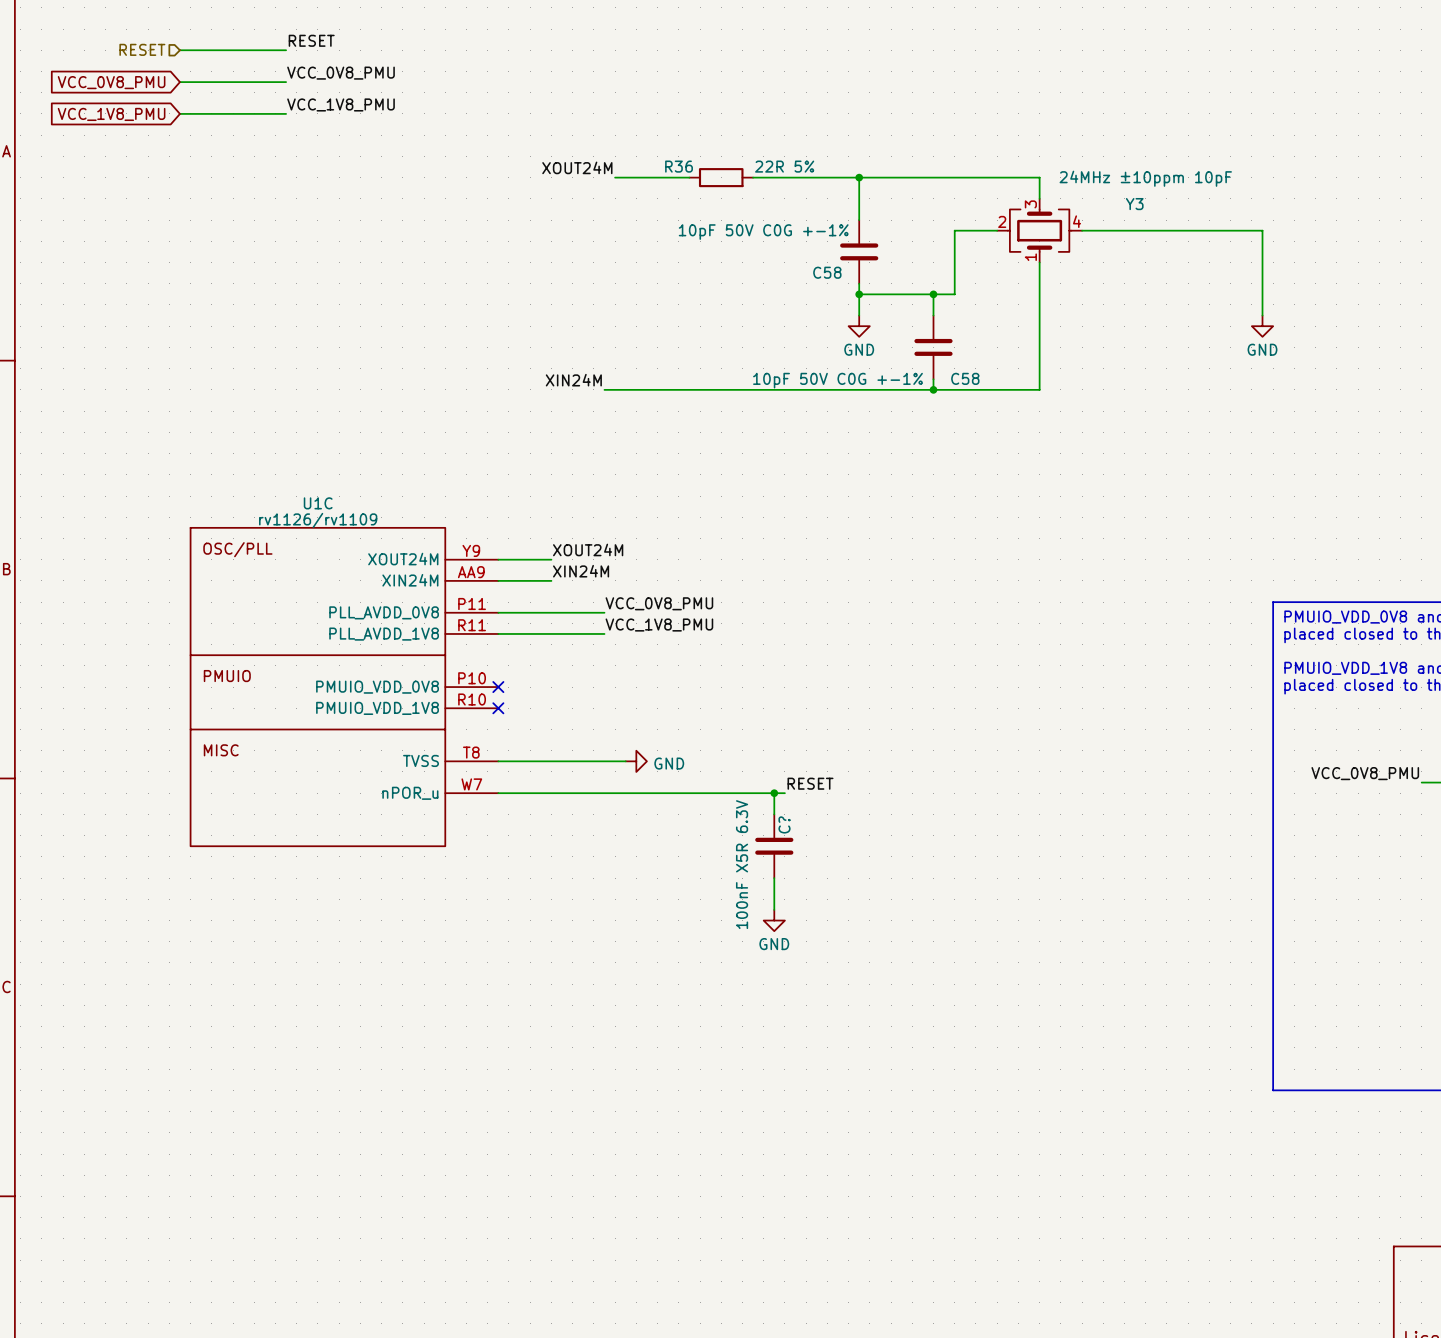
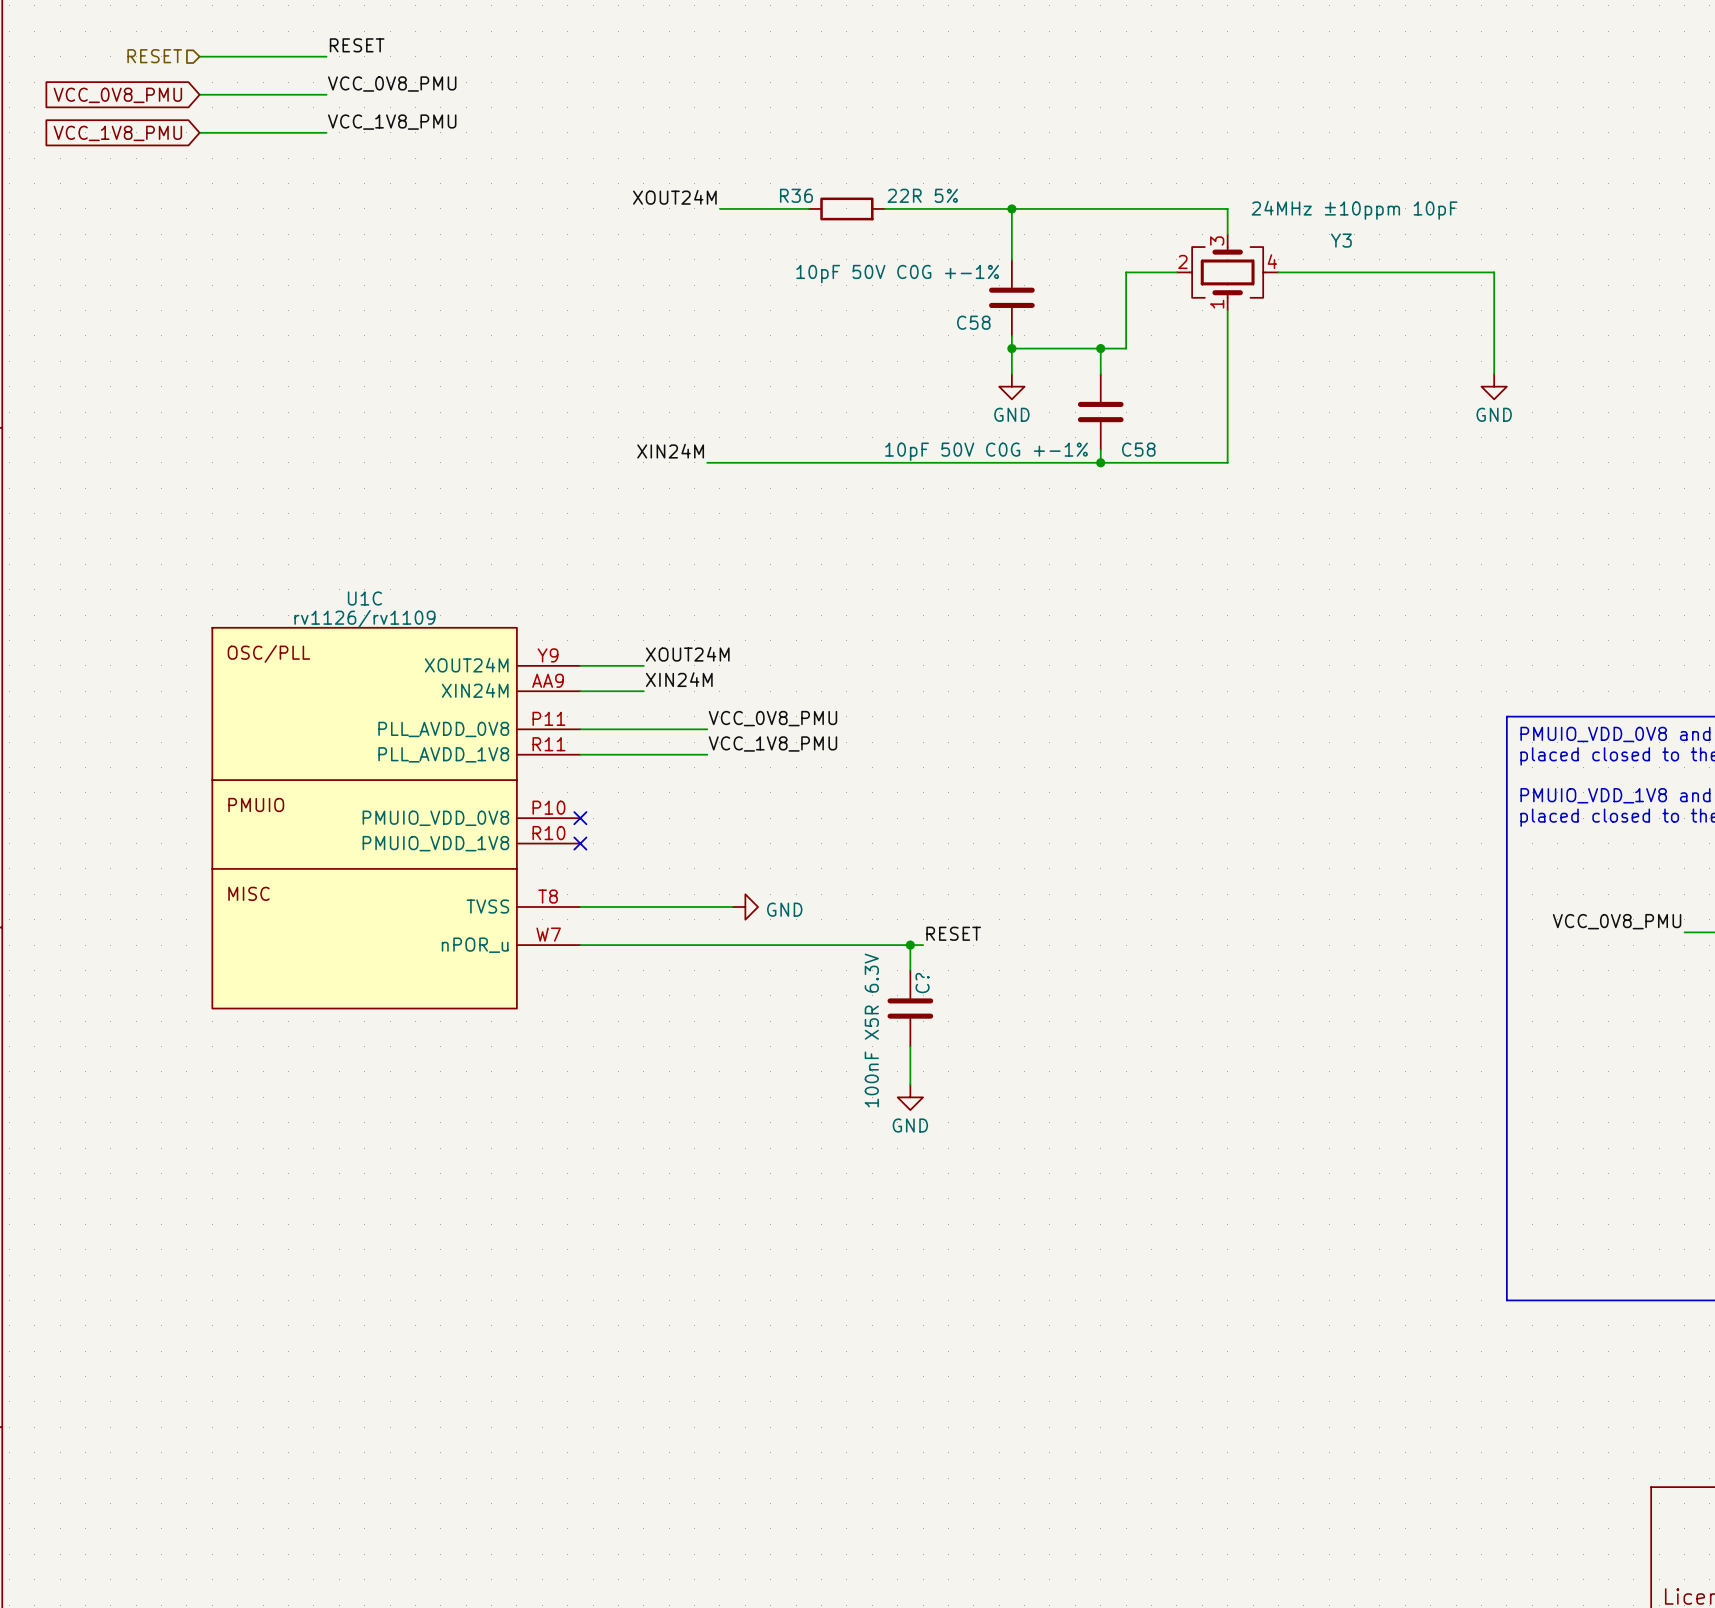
U1C symbol: [190, 527, 499, 847] -> [212, 627, 581, 1009]

